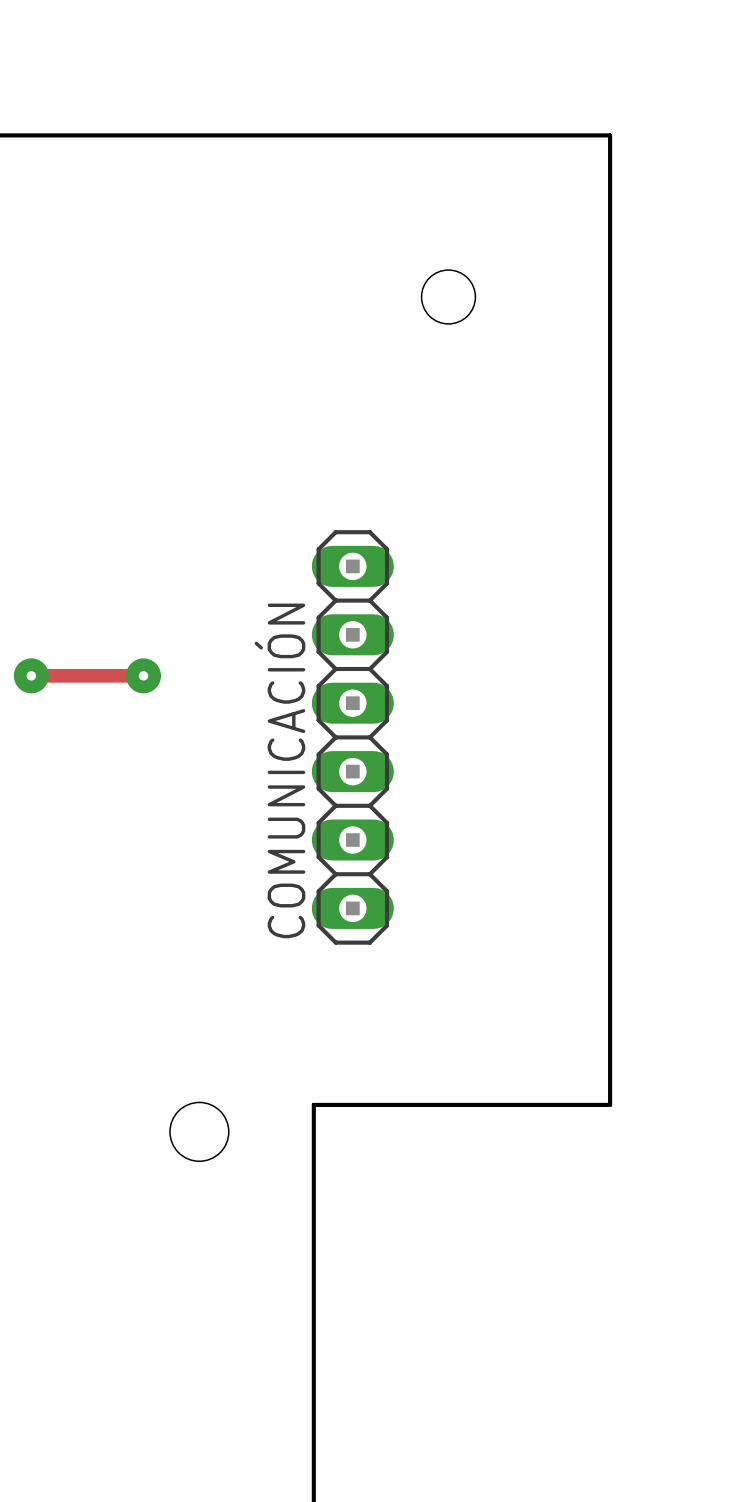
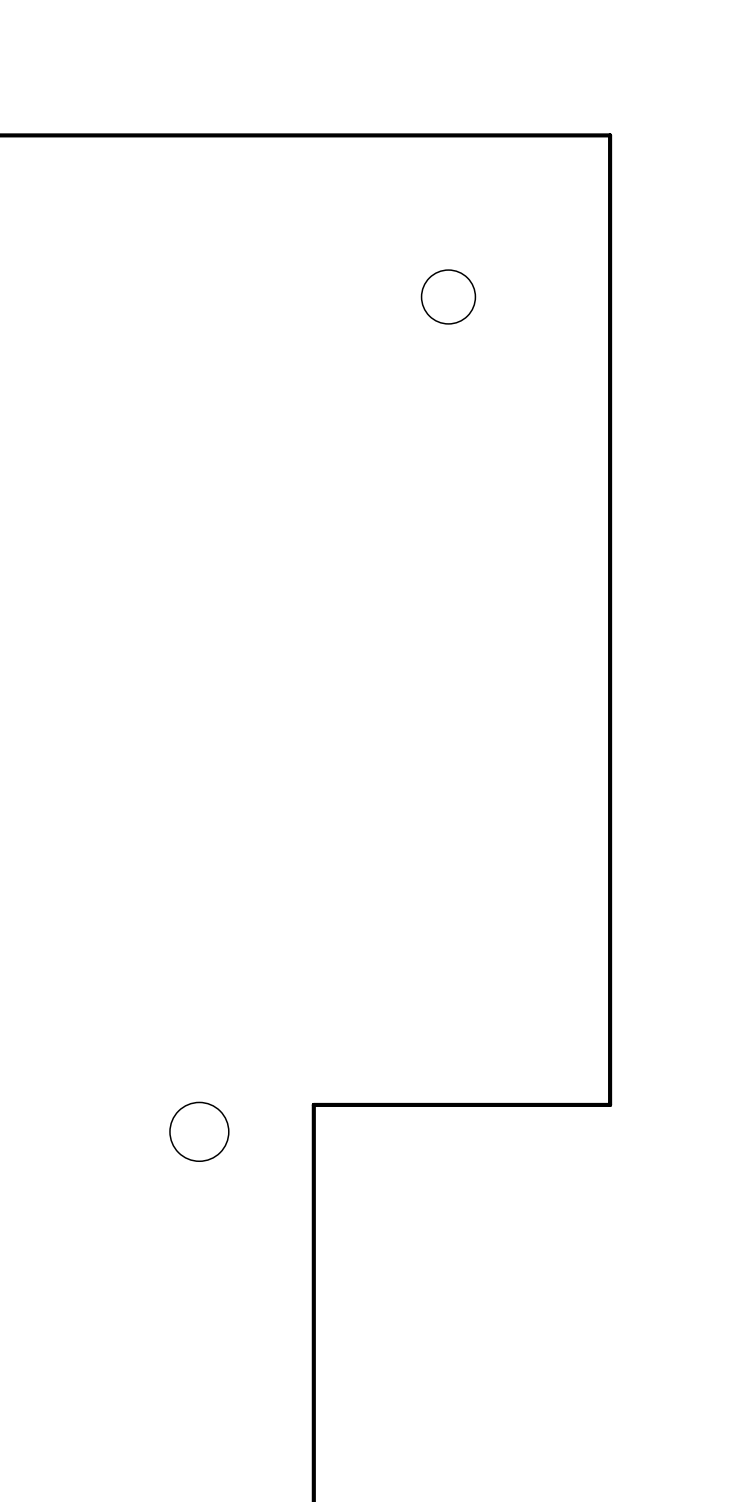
track: (31, 675) (143, 675) -> none
via: (31, 675) -> none
via: (143, 675) -> none
COMUNICACIÓN: (352, 737) -> none

